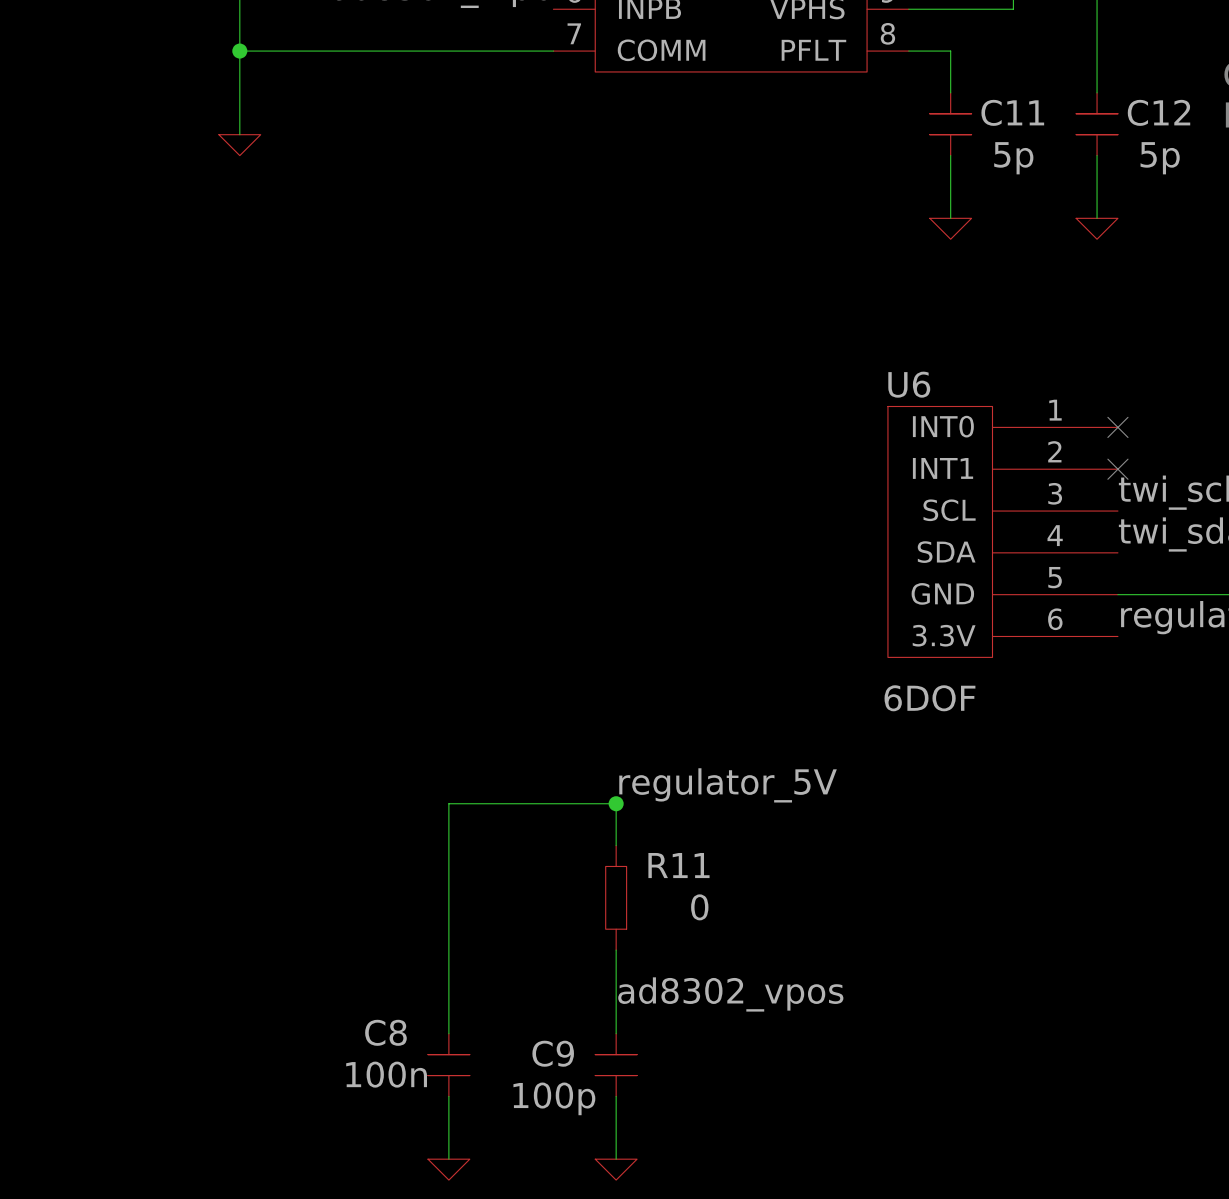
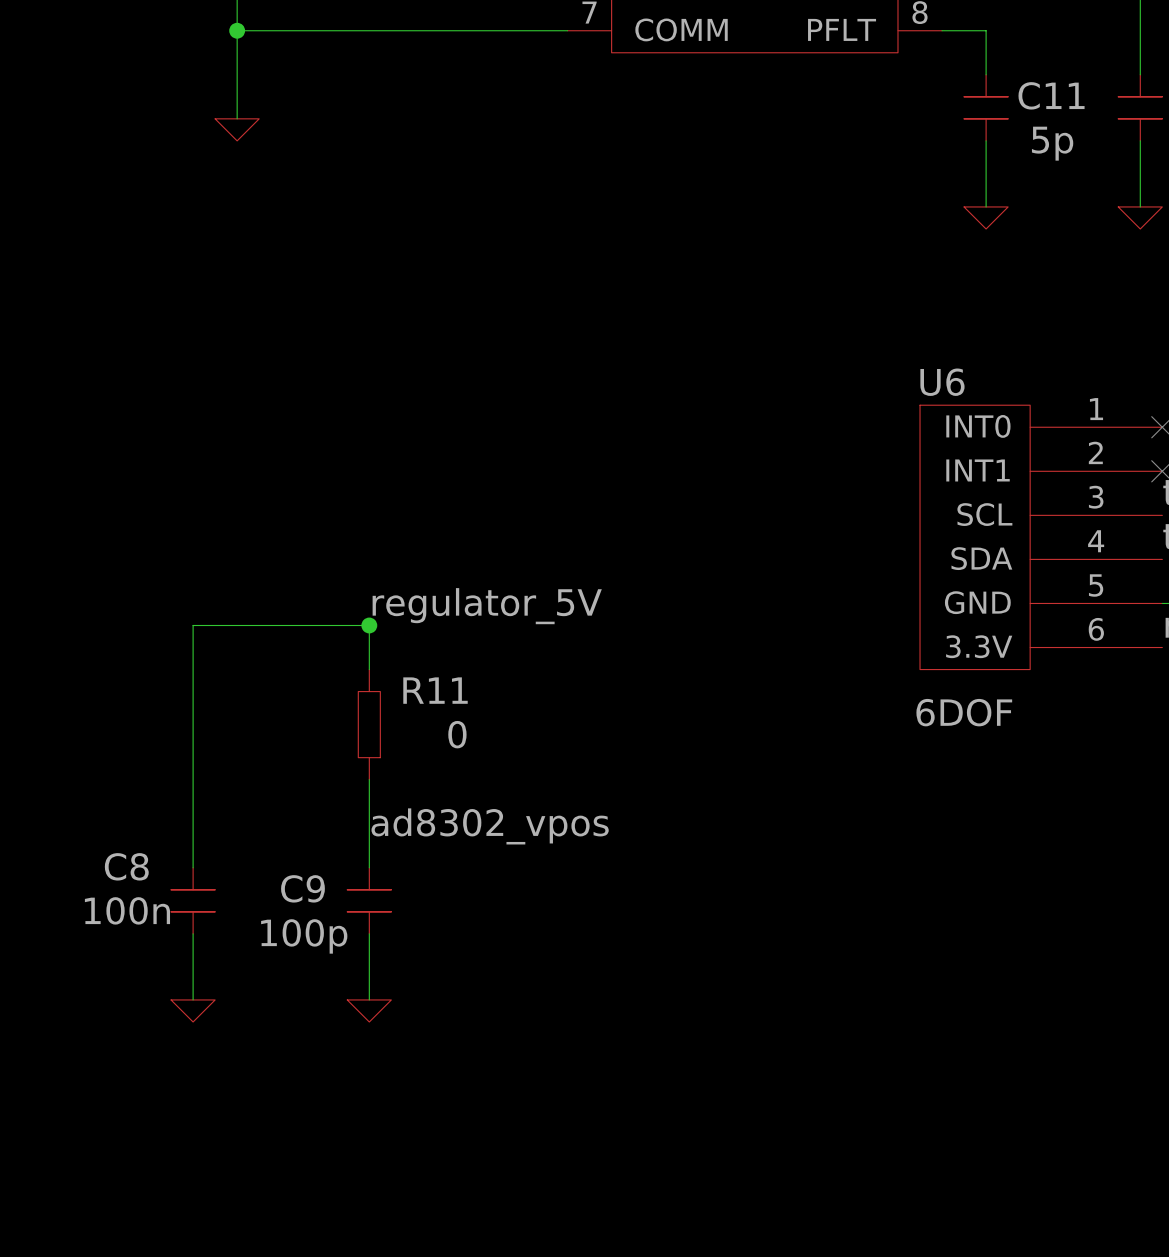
junction: none -> (369, 625)
label position: regulator_5V (728, 785) -> regulator_5V (487, 606)
junction: (616, 803) -> none
wire: (616, 845) (616, 803) (448, 803) (448, 1033) -> (369, 669) (369, 625) (193, 625) (193, 867)
R11 position: (616, 897) -> (369, 724)
wire: (616, 950) (616, 1033) -> (369, 779) (369, 867)
power symbol: none -> (193, 1010)
power symbol: none -> (369, 1010)
label position: ad8302_vpos (730, 994) -> ad8302_vpos (490, 826)
C8 position: (448, 1065) -> (193, 900)
C9 position: (616, 1065) -> (369, 900)
wire: (448, 1096) (448, 1159) -> (193, 933) (193, 999)
wire: (616, 1096) (616, 1159) -> (369, 933) (369, 999)
power symbol: (448, 1169) -> none
power symbol: (616, 1169) -> none

